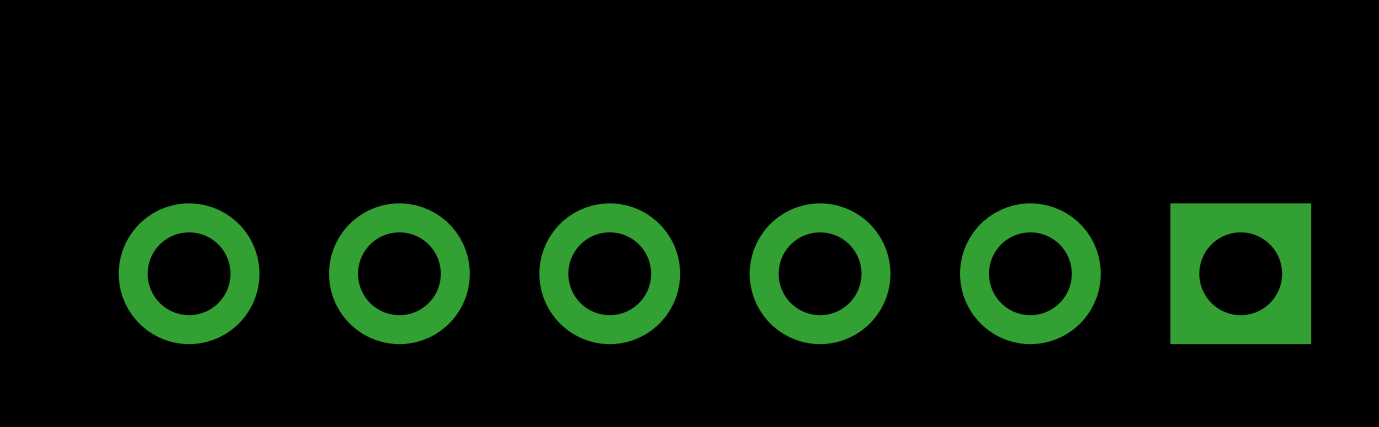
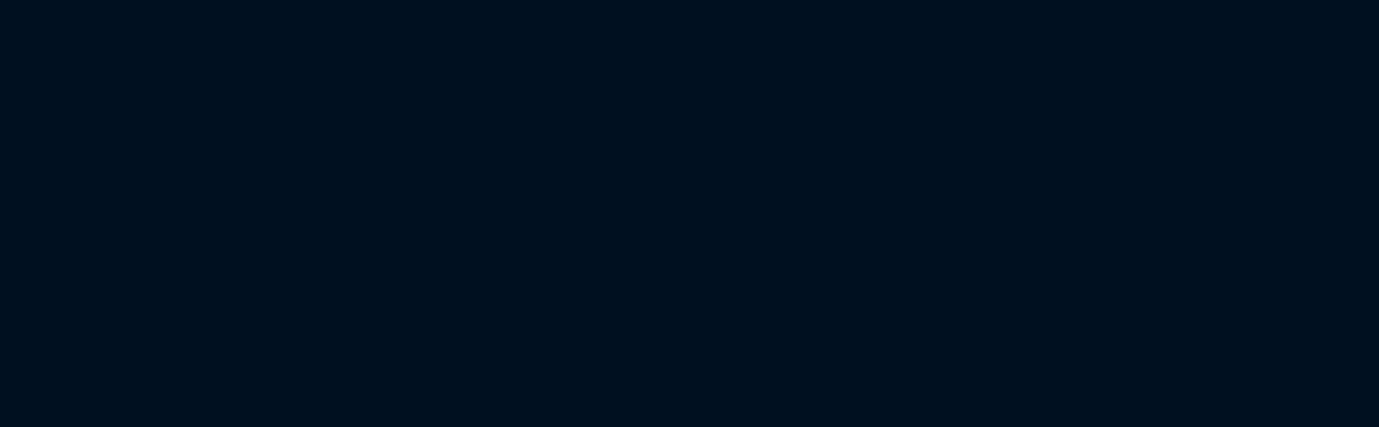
part: (714, 273) -> none

